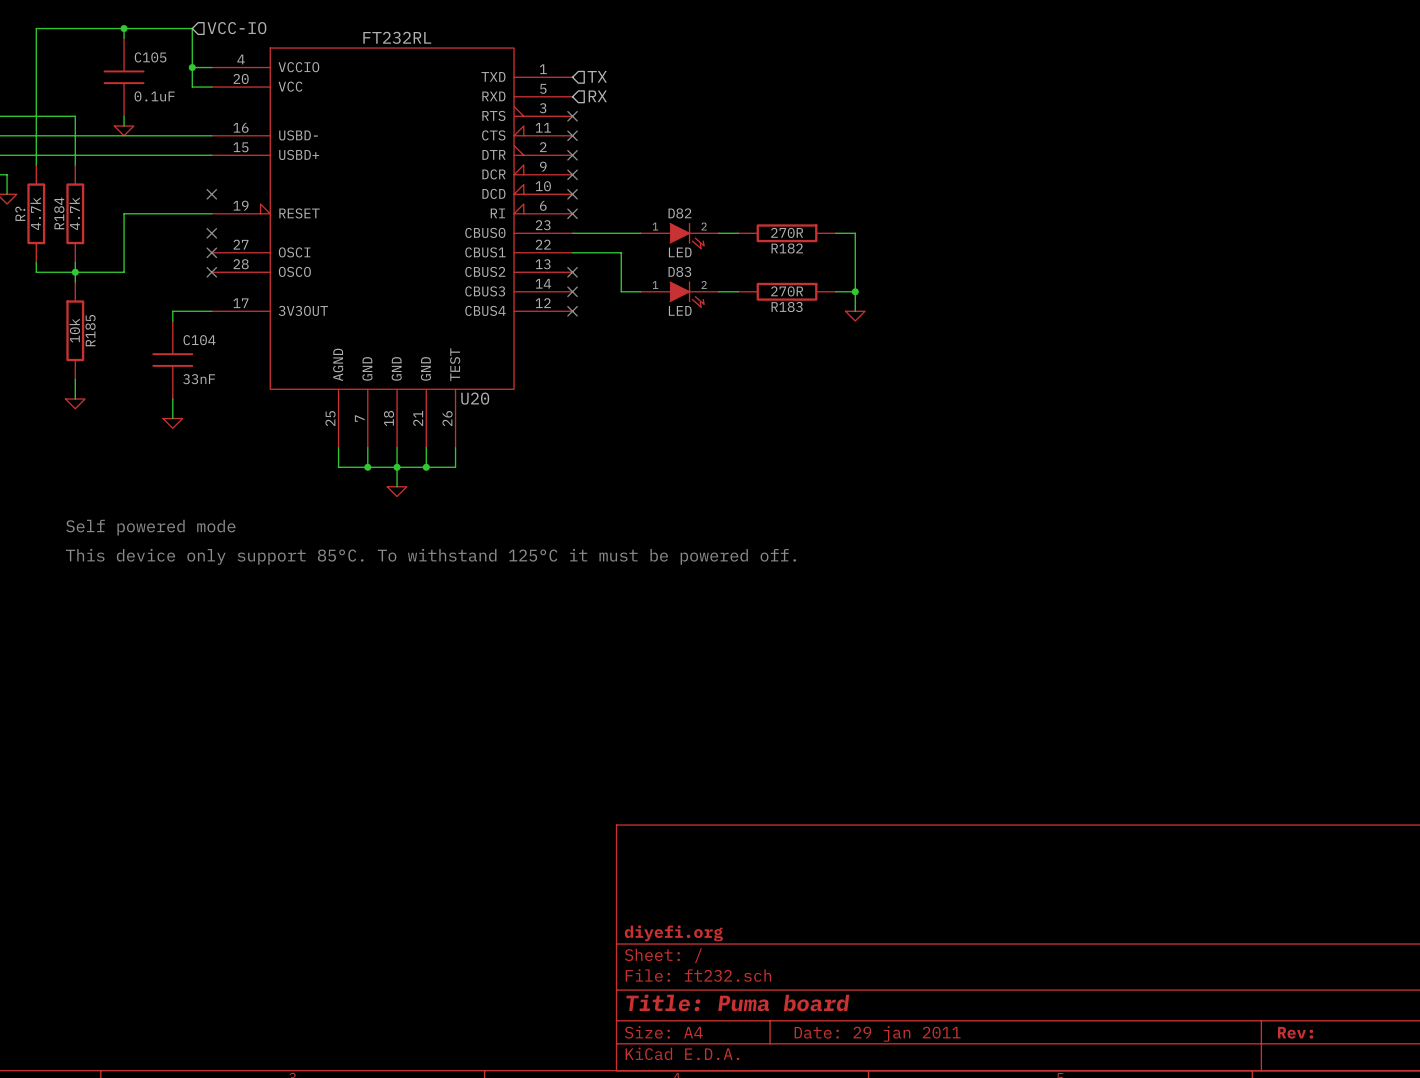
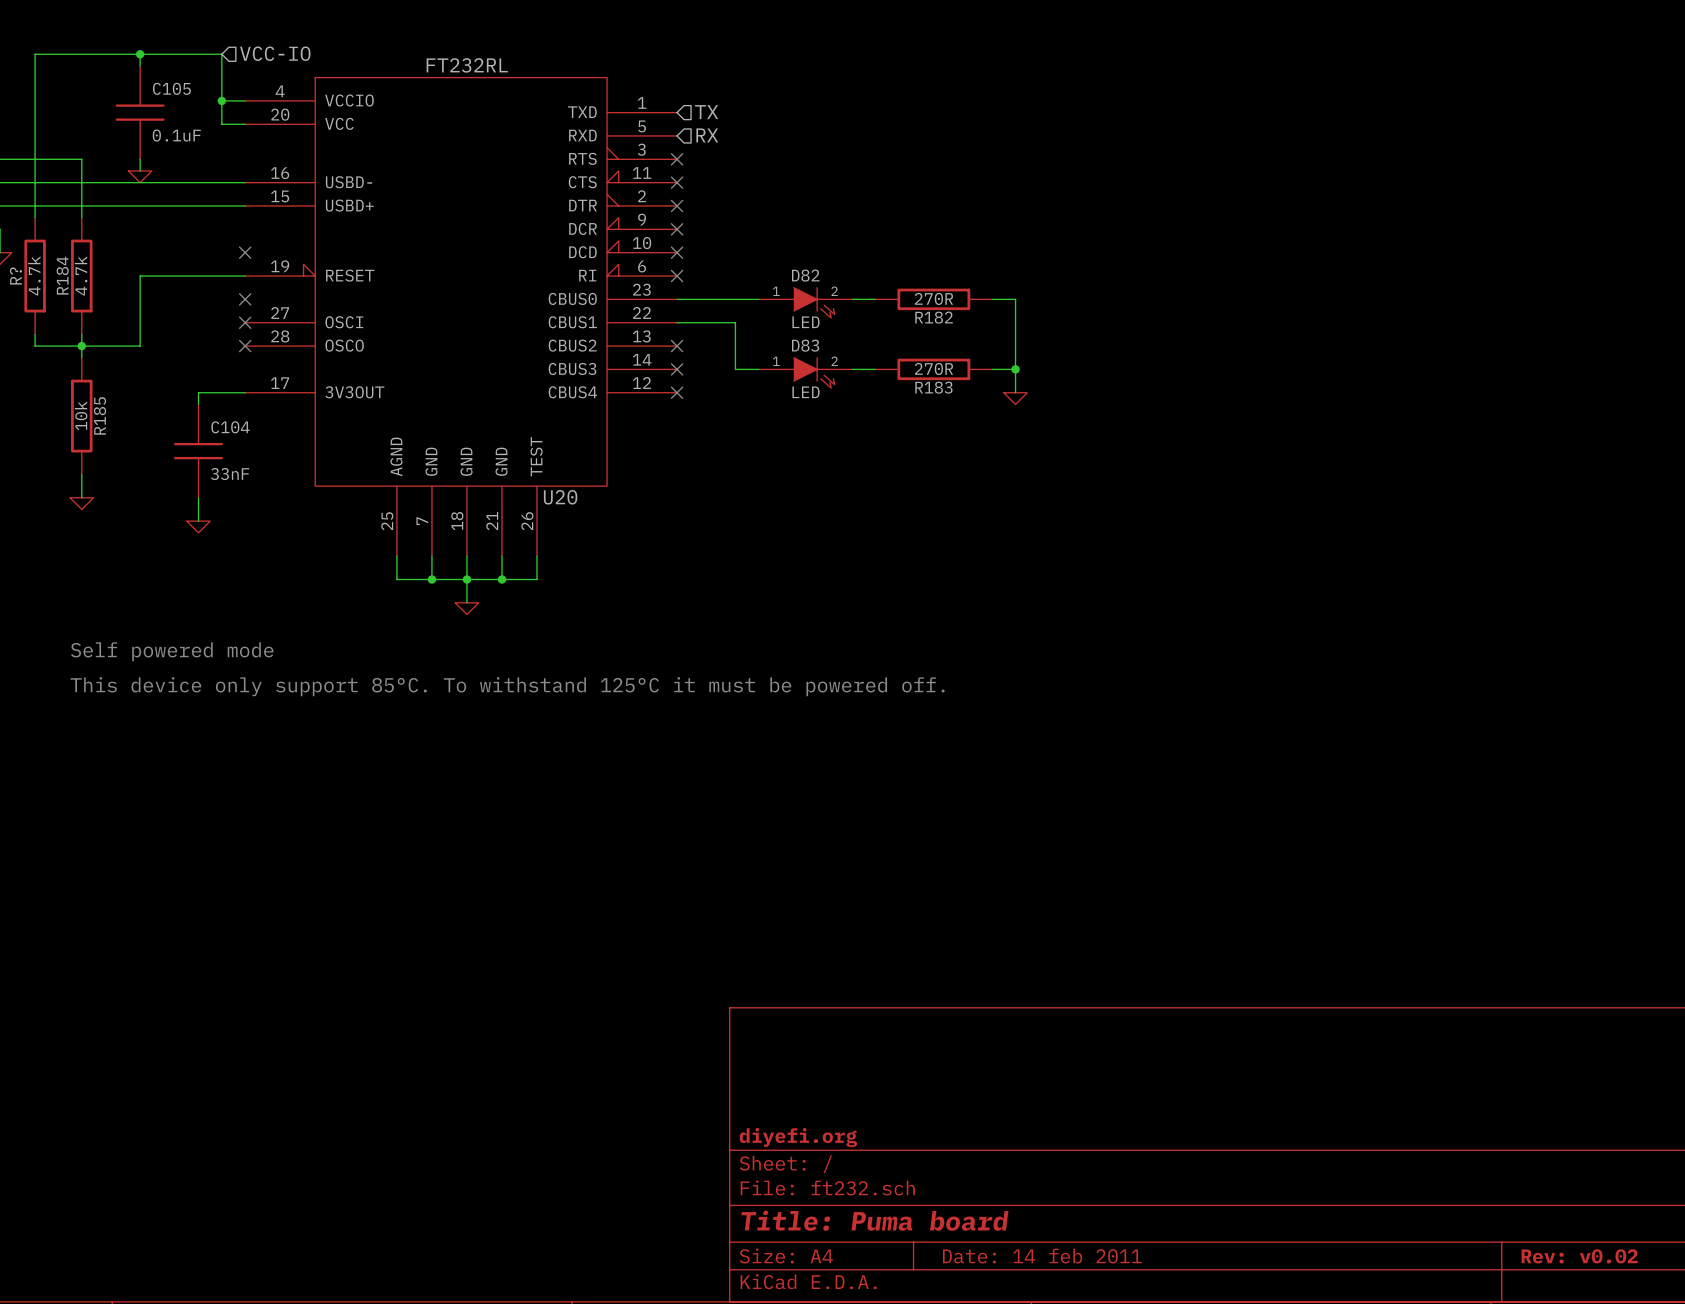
title block: Rev: (1295, 1032) -> Rev: v0.02 (1579, 1256)
title block: Date: 29 jan 2011 (877, 1033) -> Date: 14 feb 2011 (1042, 1256)

